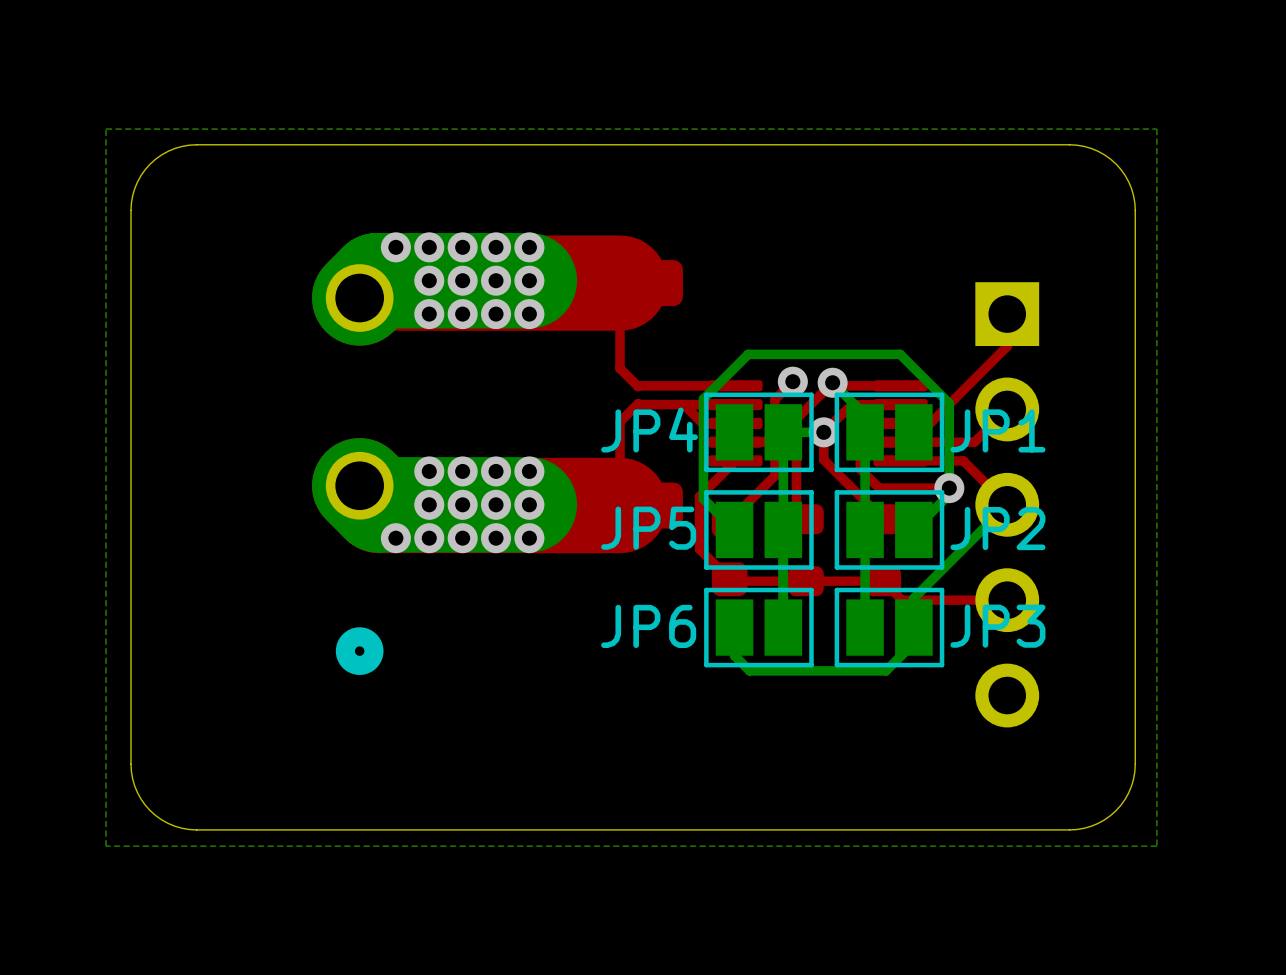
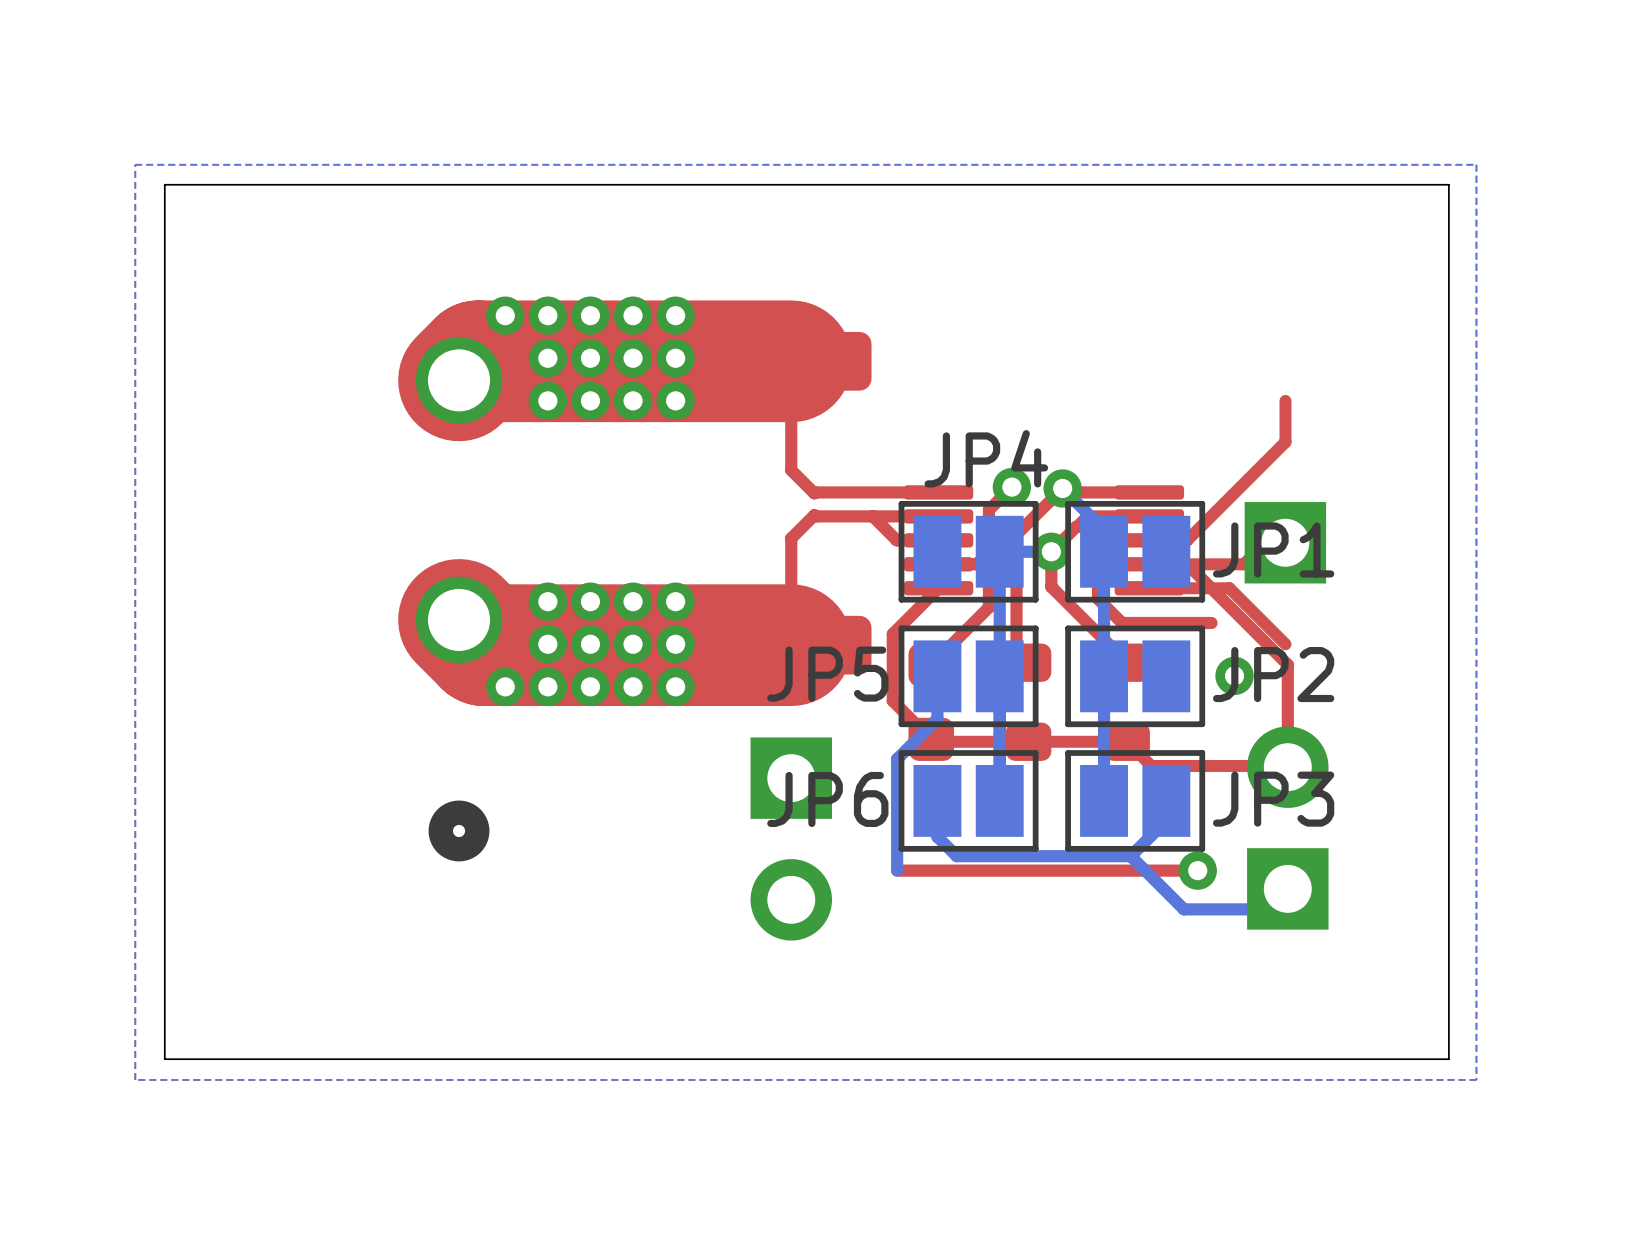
board edge: (196, 144) (175, 148) (161, 154) (150, 164) (137, 181) (131, 203) (131, 764) (134, 785) (141, 799) (150, 810) (168, 823) (182, 828) (196, 829) -> (251, 184) (164, 184) (164, 1059) (251, 1059)
board edge: (1069, 144) (1084, 146) (1098, 151) (1116, 164) (1125, 175) (1131, 188) (1135, 210) -> (1365, 184) (1448, 184) (1448, 268)
bottom track: (529, 280) (376, 280) (359, 298) -> none
part: none -> (1285, 542)
JP4 name position: JP4 (649, 430) -> JP4 (986, 458)
top track: none -> (1187, 564) (1287, 664) (1287, 767)
bottom track: (359, 485) (378, 504) (529, 504) -> none
via position: (949, 488) -> (1234, 675)
bottom track: (1007, 504) (913, 598) (913, 627) -> none
part: (1007, 504) -> none
bottom track: (913, 529) (949, 494) (949, 403) (900, 354) (748, 354) (703, 399) (703, 498) (734, 529) -> (897, 870) (897, 759) (937, 718) (937, 676)
part: none -> (1287, 828)
part: none -> (791, 838)
bottom track: none -> (1130, 856) (1183, 909) (1267, 909) (1287, 888)
top track: none -> (1197, 870) (897, 870)
via: none -> (1197, 870)
board edge: (1135, 764) (1133, 778) (1128, 792) (1116, 810) (1104, 819) (1091, 826) (1069, 829) -> (1448, 975) (1448, 1059) (1365, 1059)

